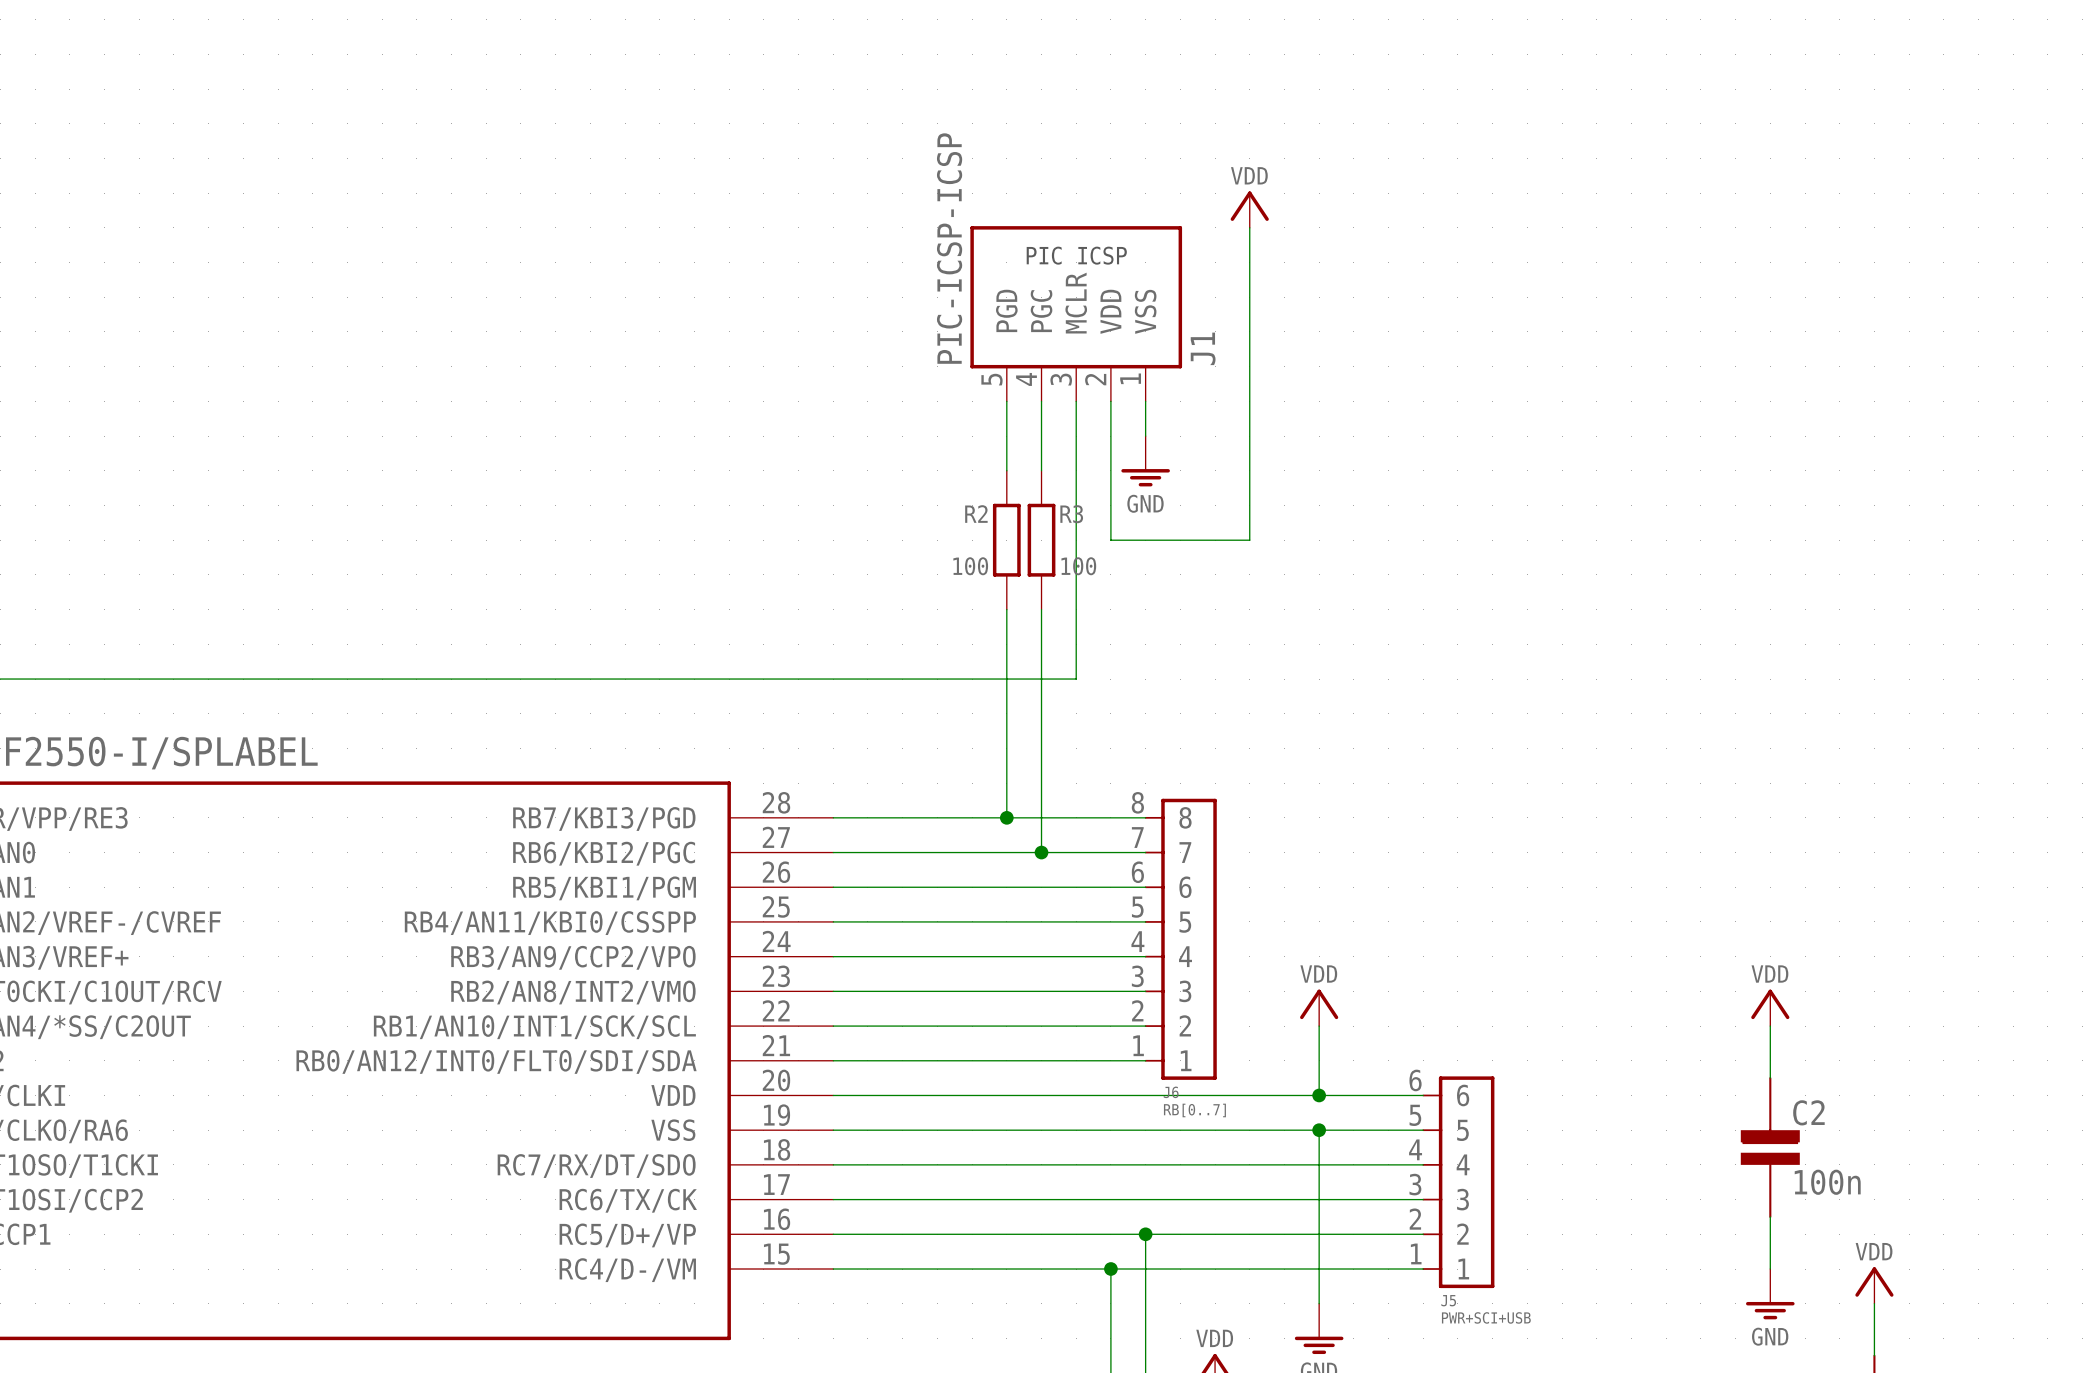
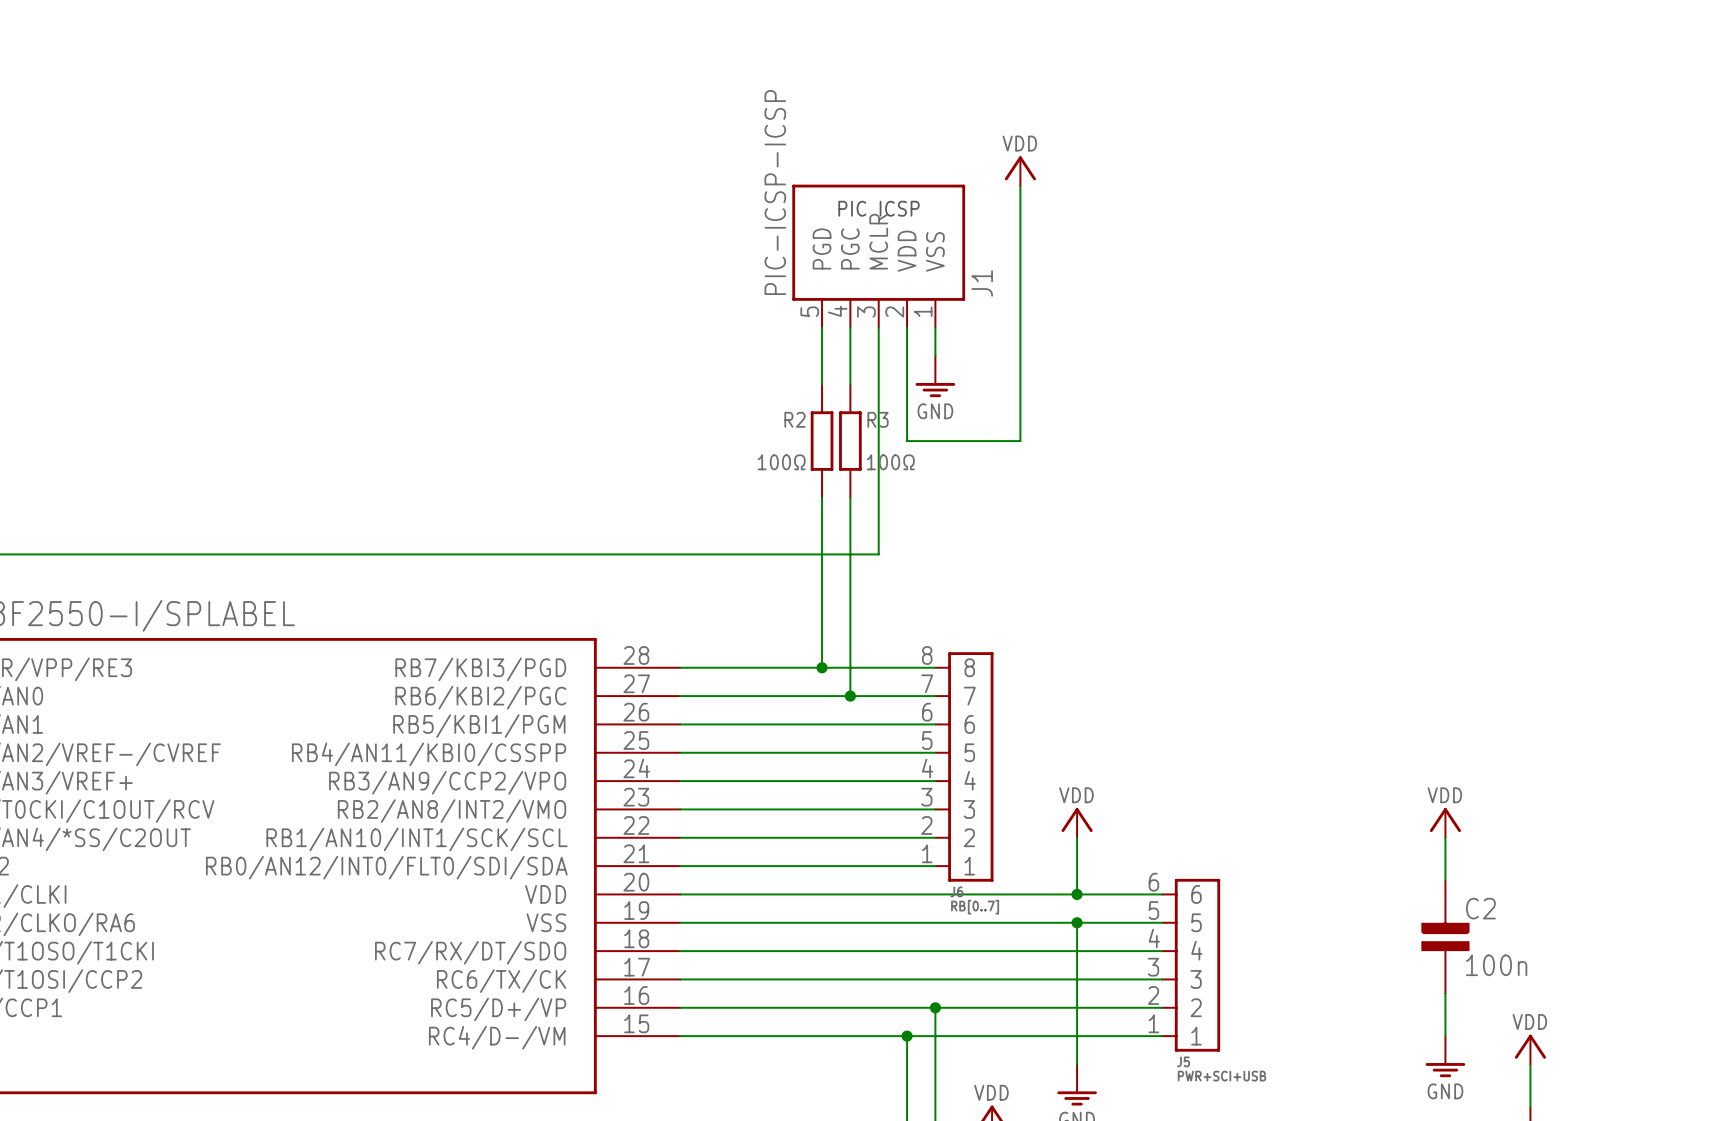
R2 value: 100 (970, 566) -> 100Ω (781, 462)
R3 value: 100 (1078, 566) -> 100Ω (890, 462)

